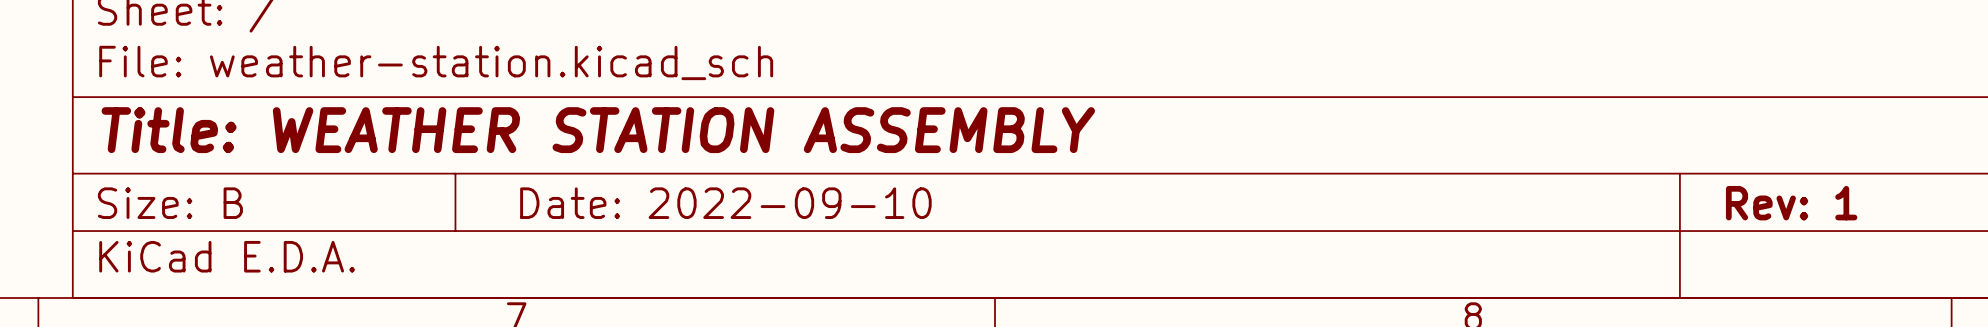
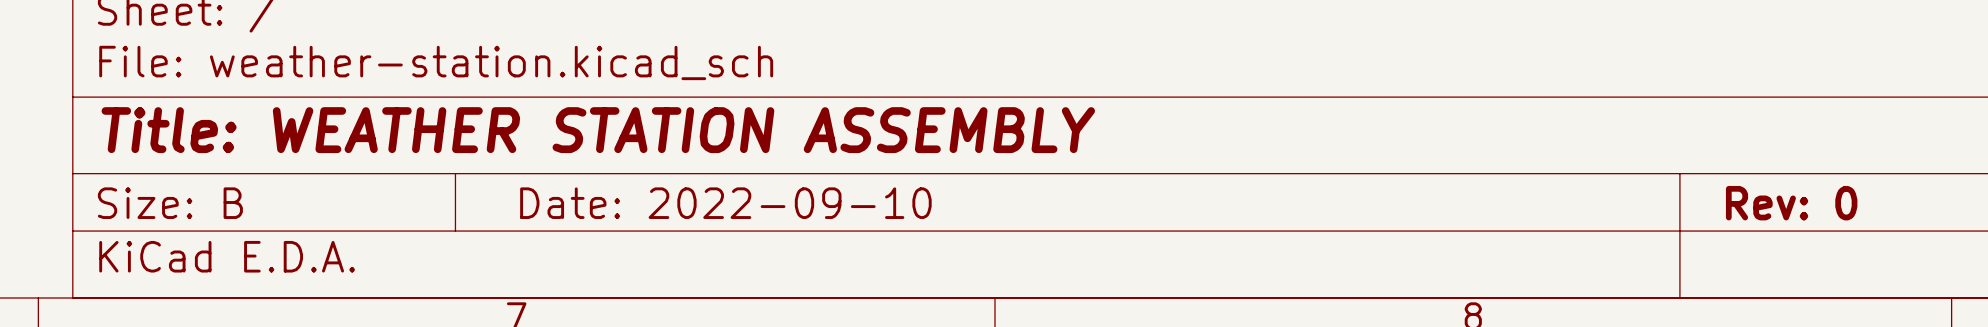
title block: Rev: 1 (1791, 203) -> Rev: 0 (1791, 203)

